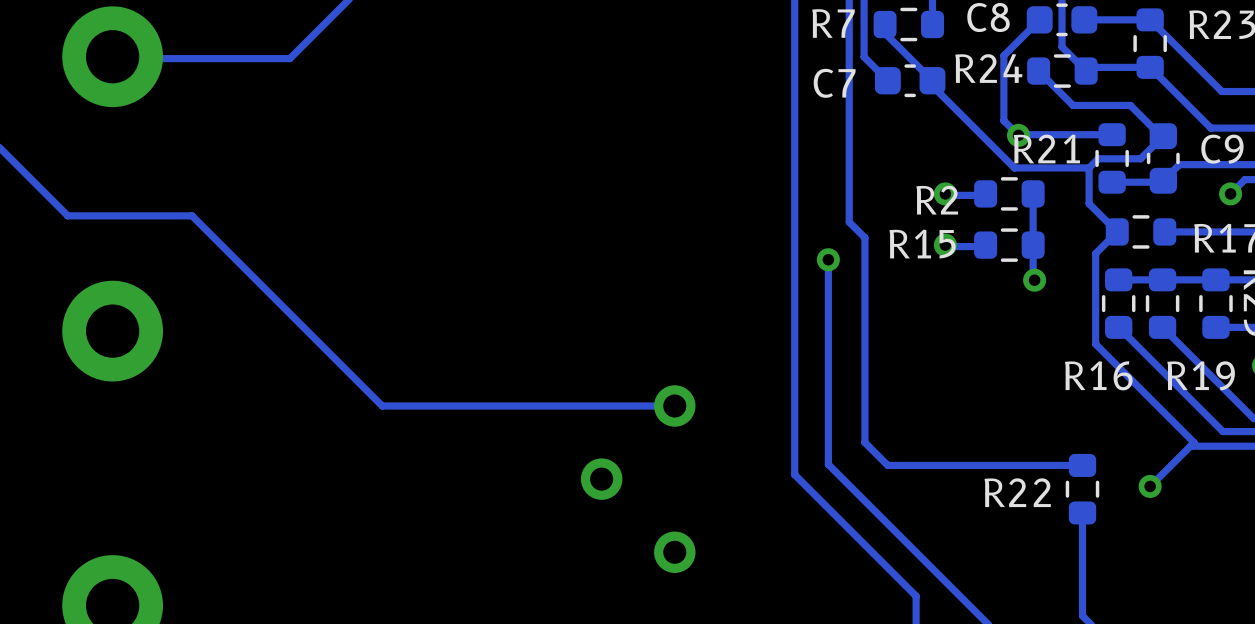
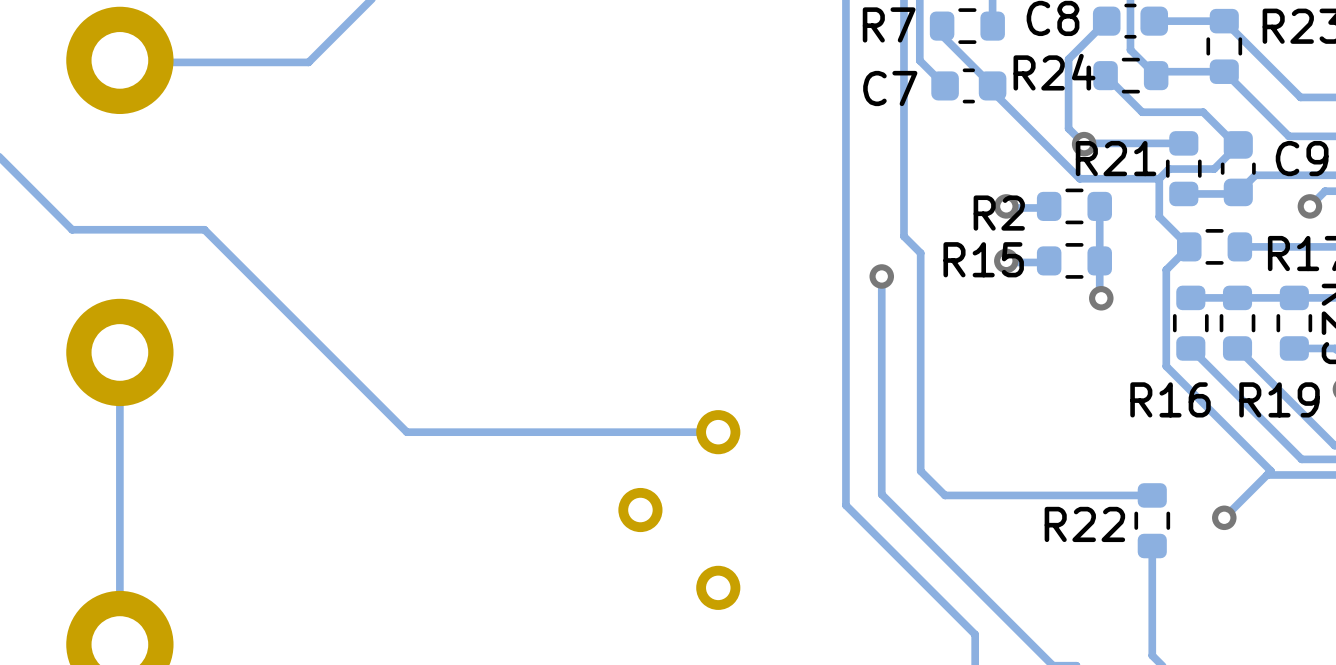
track: none -> (119, 352) (119, 644)

